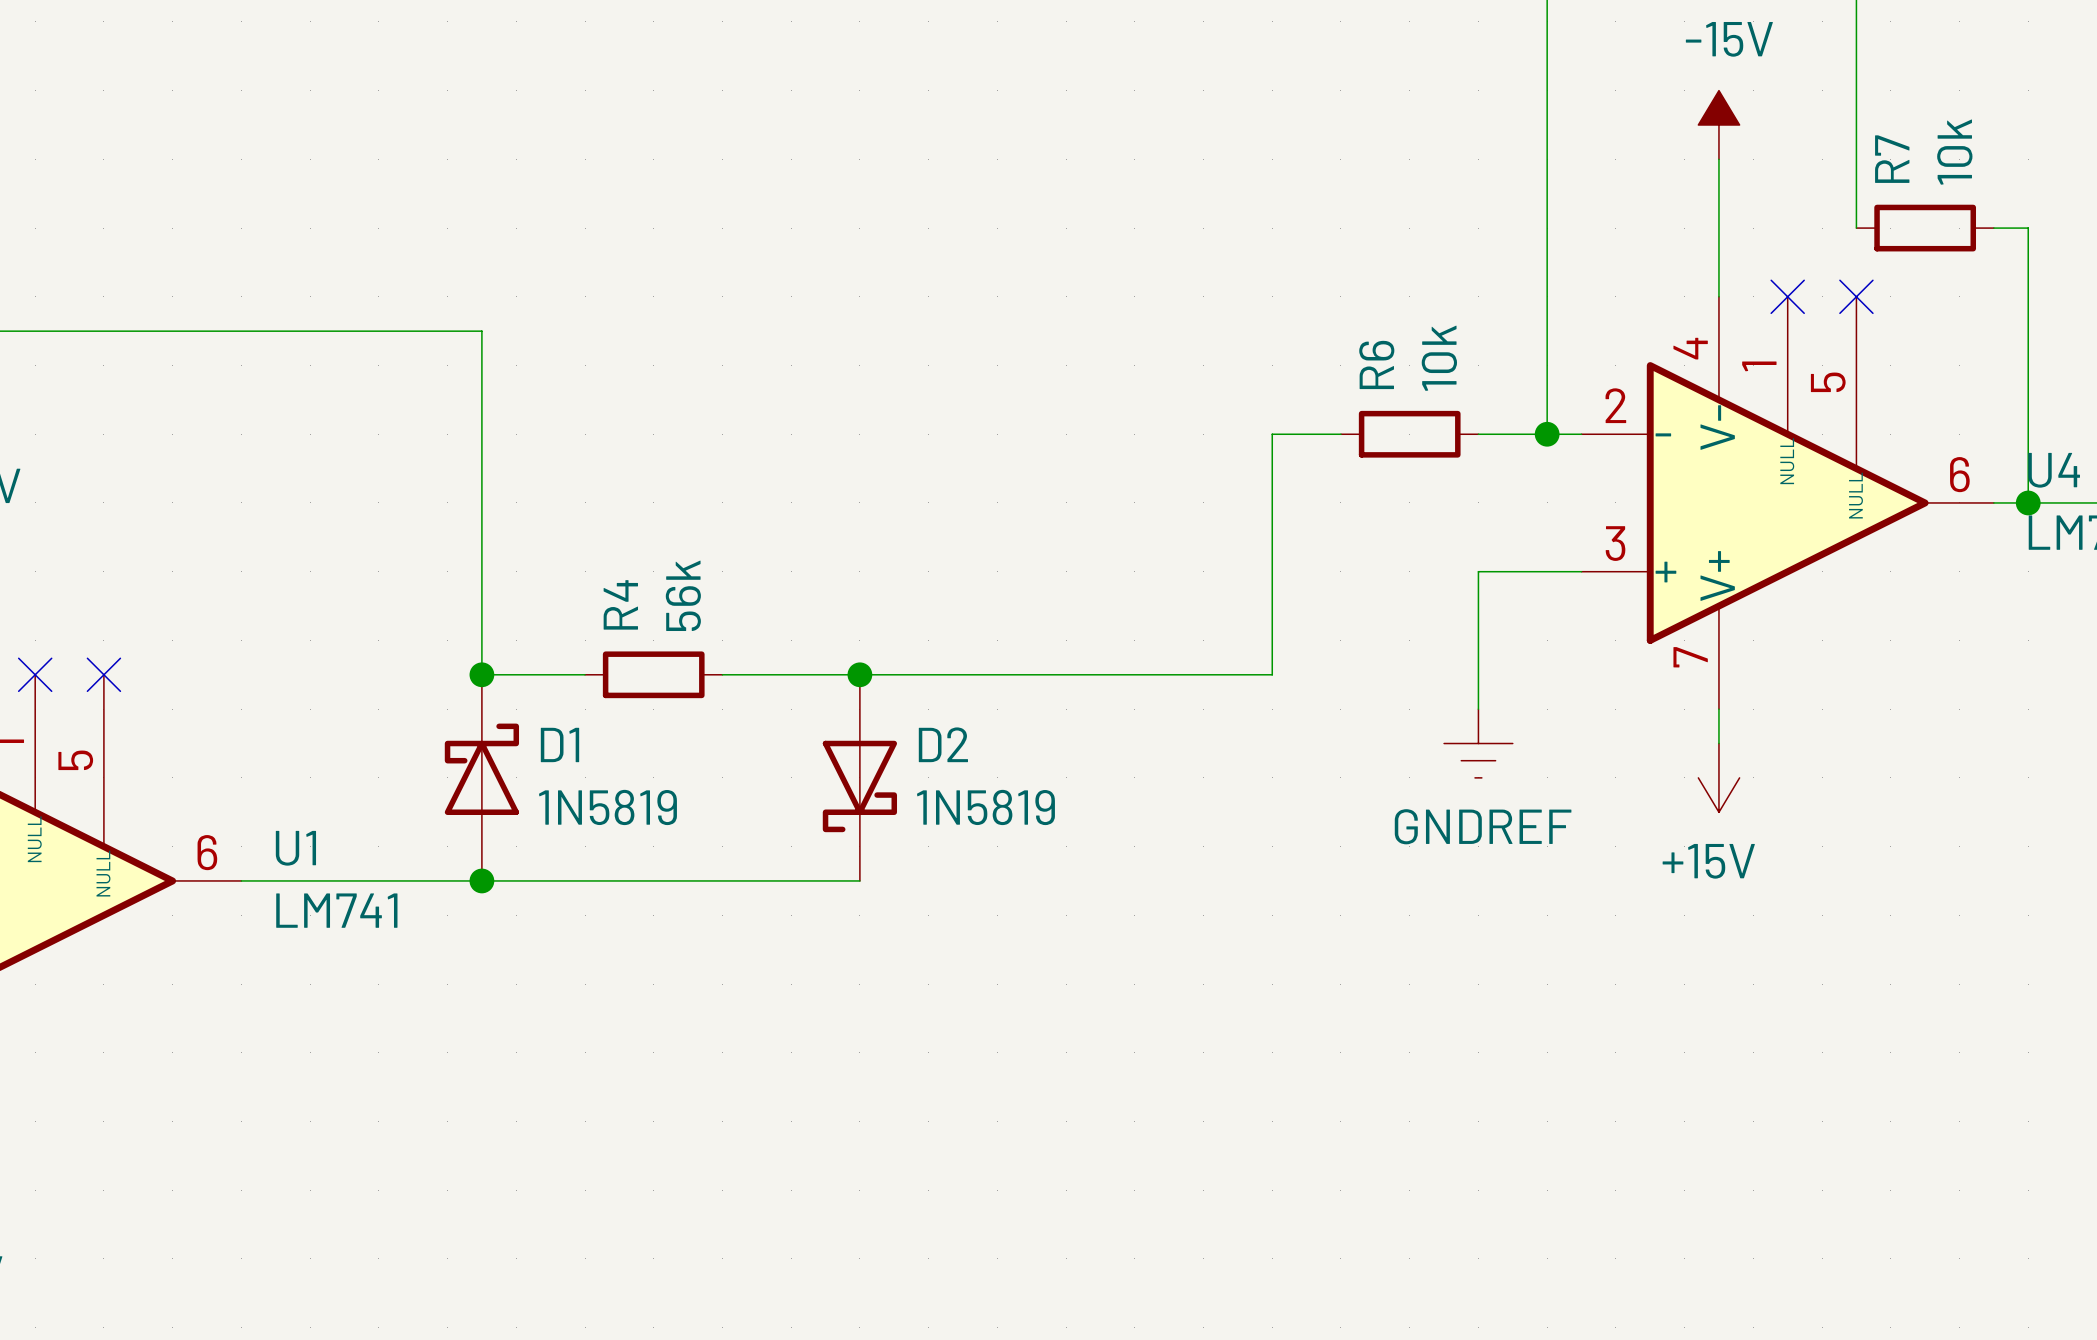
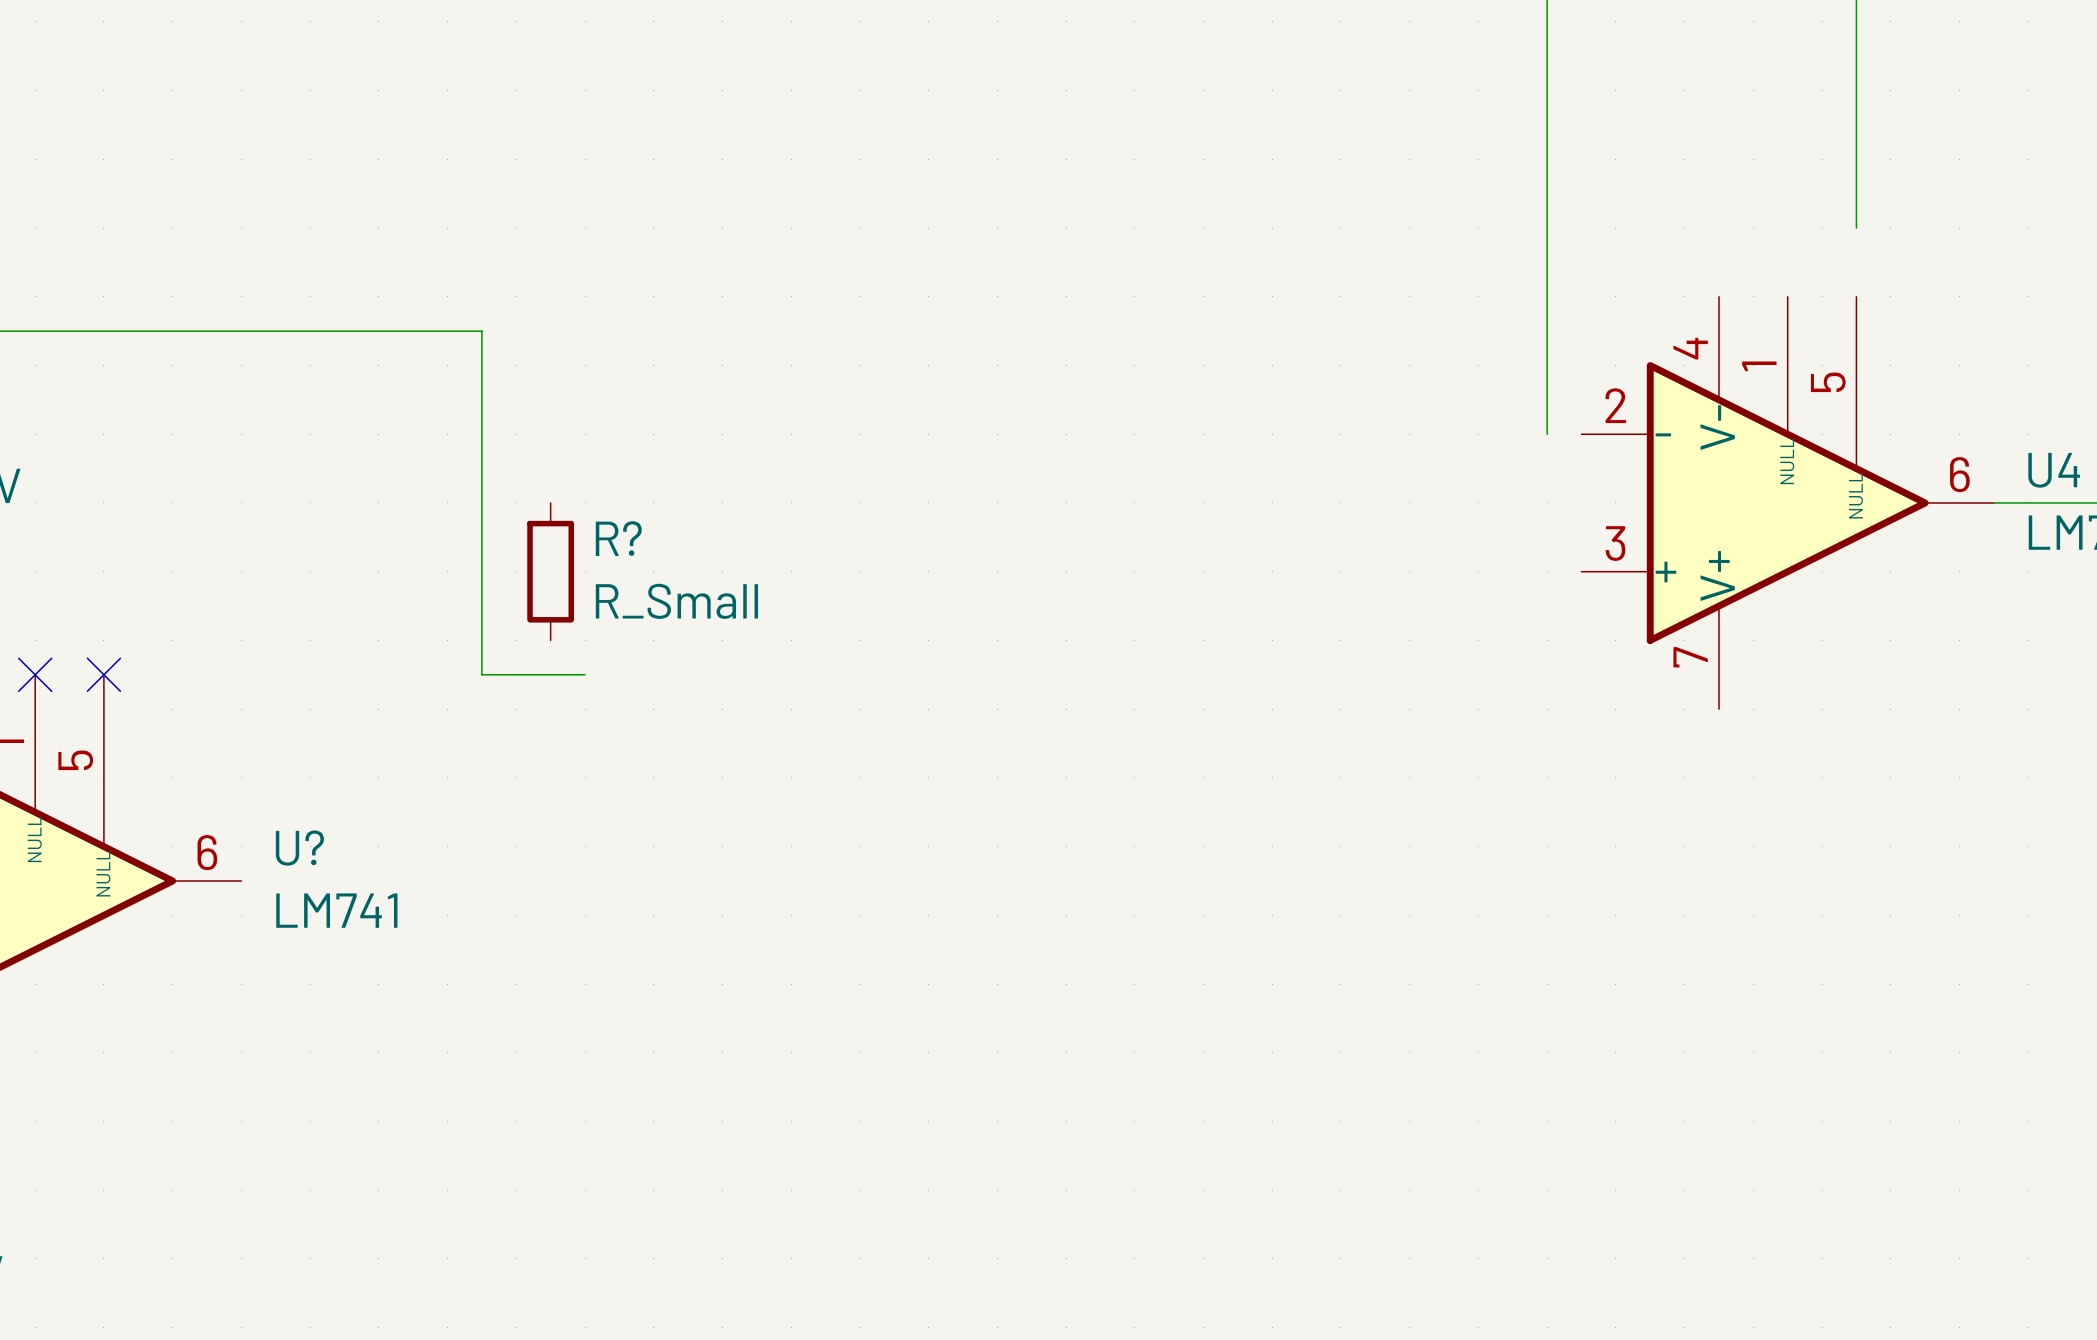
power symbol: -15V (1718, 124) -> none
wire: (1718, 159) (1718, 296) -> none
R7: 10k (1925, 228) -> none
wire: (1993, 228) (2028, 228) (2028, 502) -> none
no-connect mark: (1787, 296) -> none
no-connect mark: (1856, 296) -> none
wire: (1340, 434) (1272, 434) (1272, 674) (722, 674) -> none
R6: 10k (1409, 434) -> none
wire: (1478, 434) (1581, 434) -> none
junction: (1547, 434) -> none
junction: (2028, 502) -> none
R?: none -> R_Small (550, 571)
wire: (1581, 571) (1478, 571) (1478, 709) -> none
junction: (481, 674) -> none
R4: 56k (653, 674) -> none
junction: (859, 674) -> none
wire: (1718, 709) (1718, 743) -> none
power symbol: GNDREF (1478, 743) -> none
D1: 1N5819 (481, 777) -> none
D2: 1N5819 (859, 777) -> none
power symbol: +15V (1718, 777) -> none
U1 name: U1 (295, 848) -> U? (299, 848)
wire: (241, 880) (859, 880) -> none
junction: (481, 880) -> none

